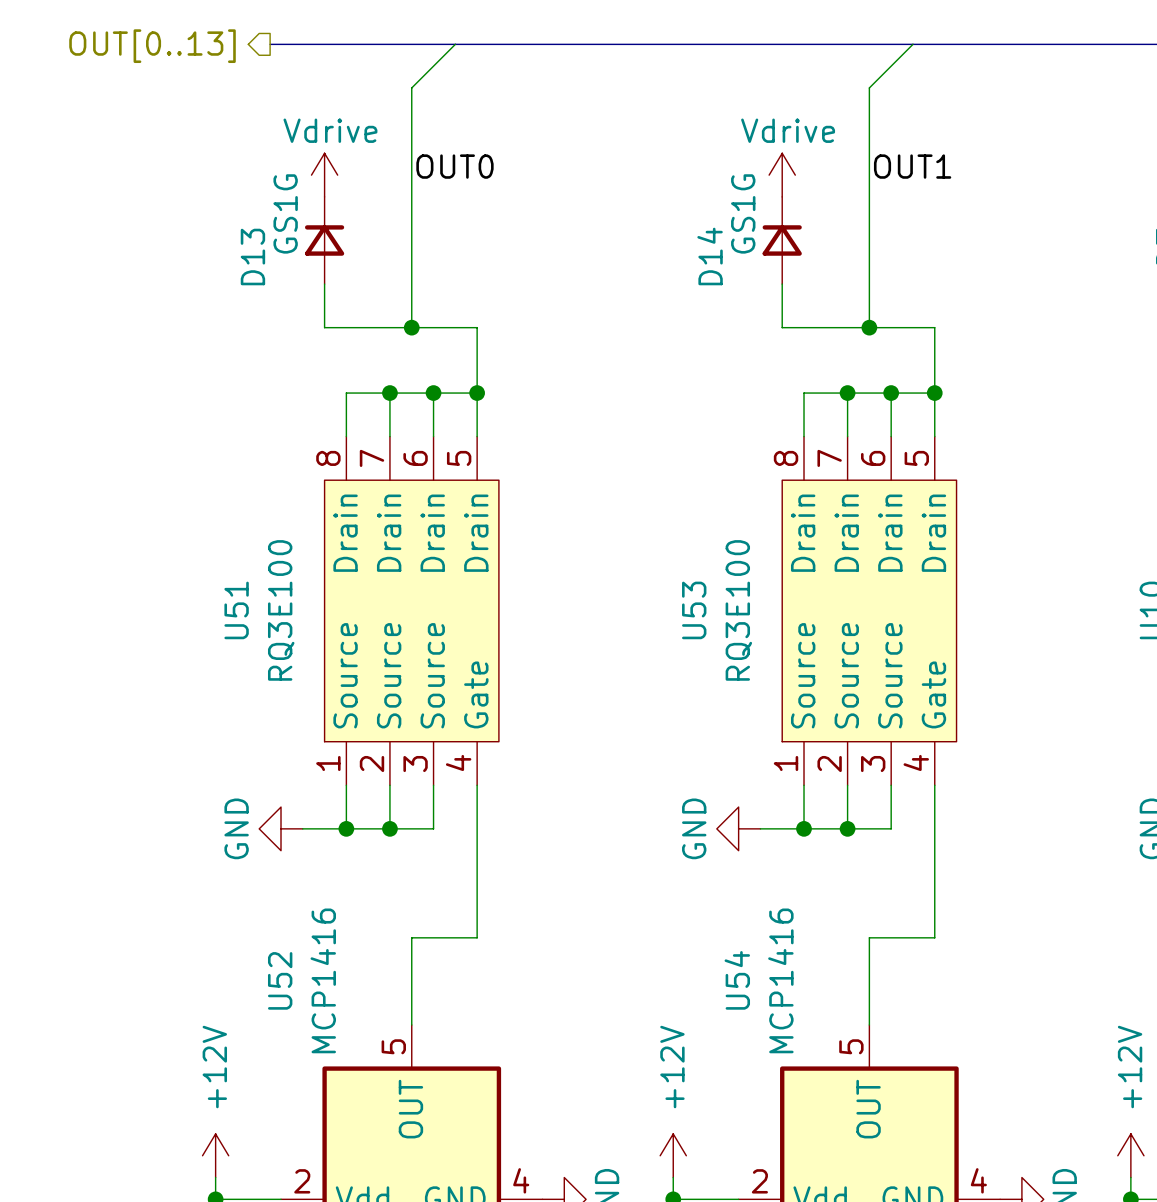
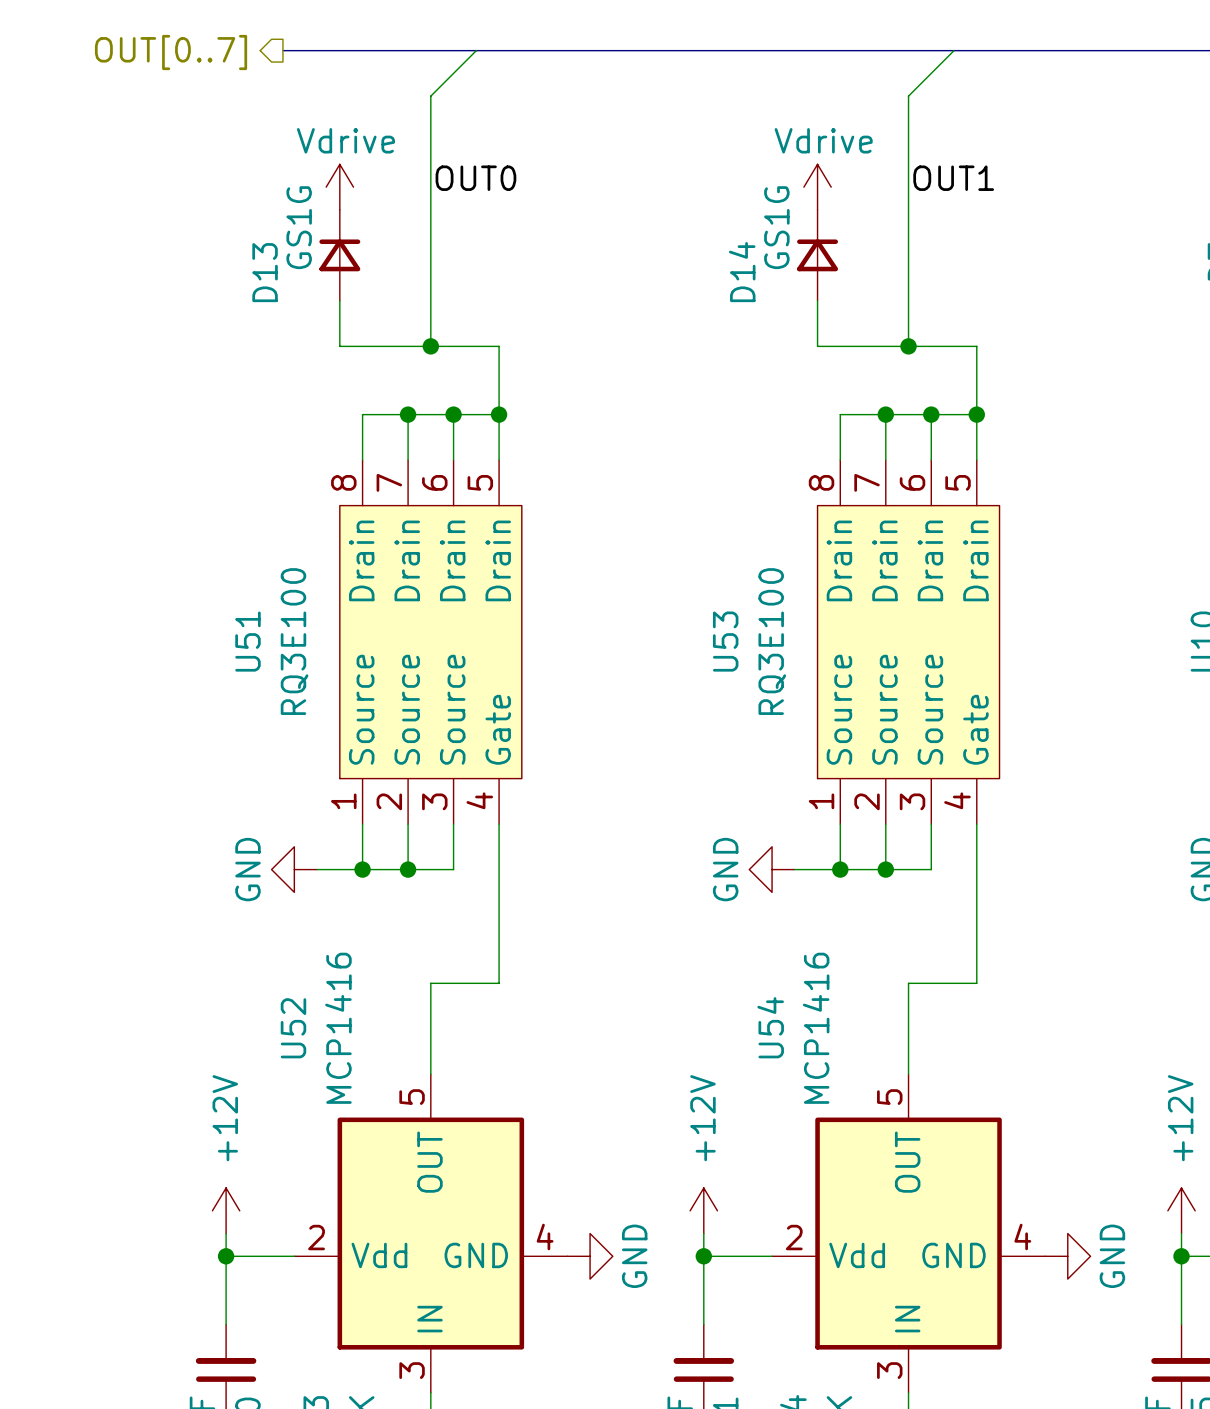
hierarchical label: OUT[0..13] (152, 46) -> OUT[0..7] (171, 52)

